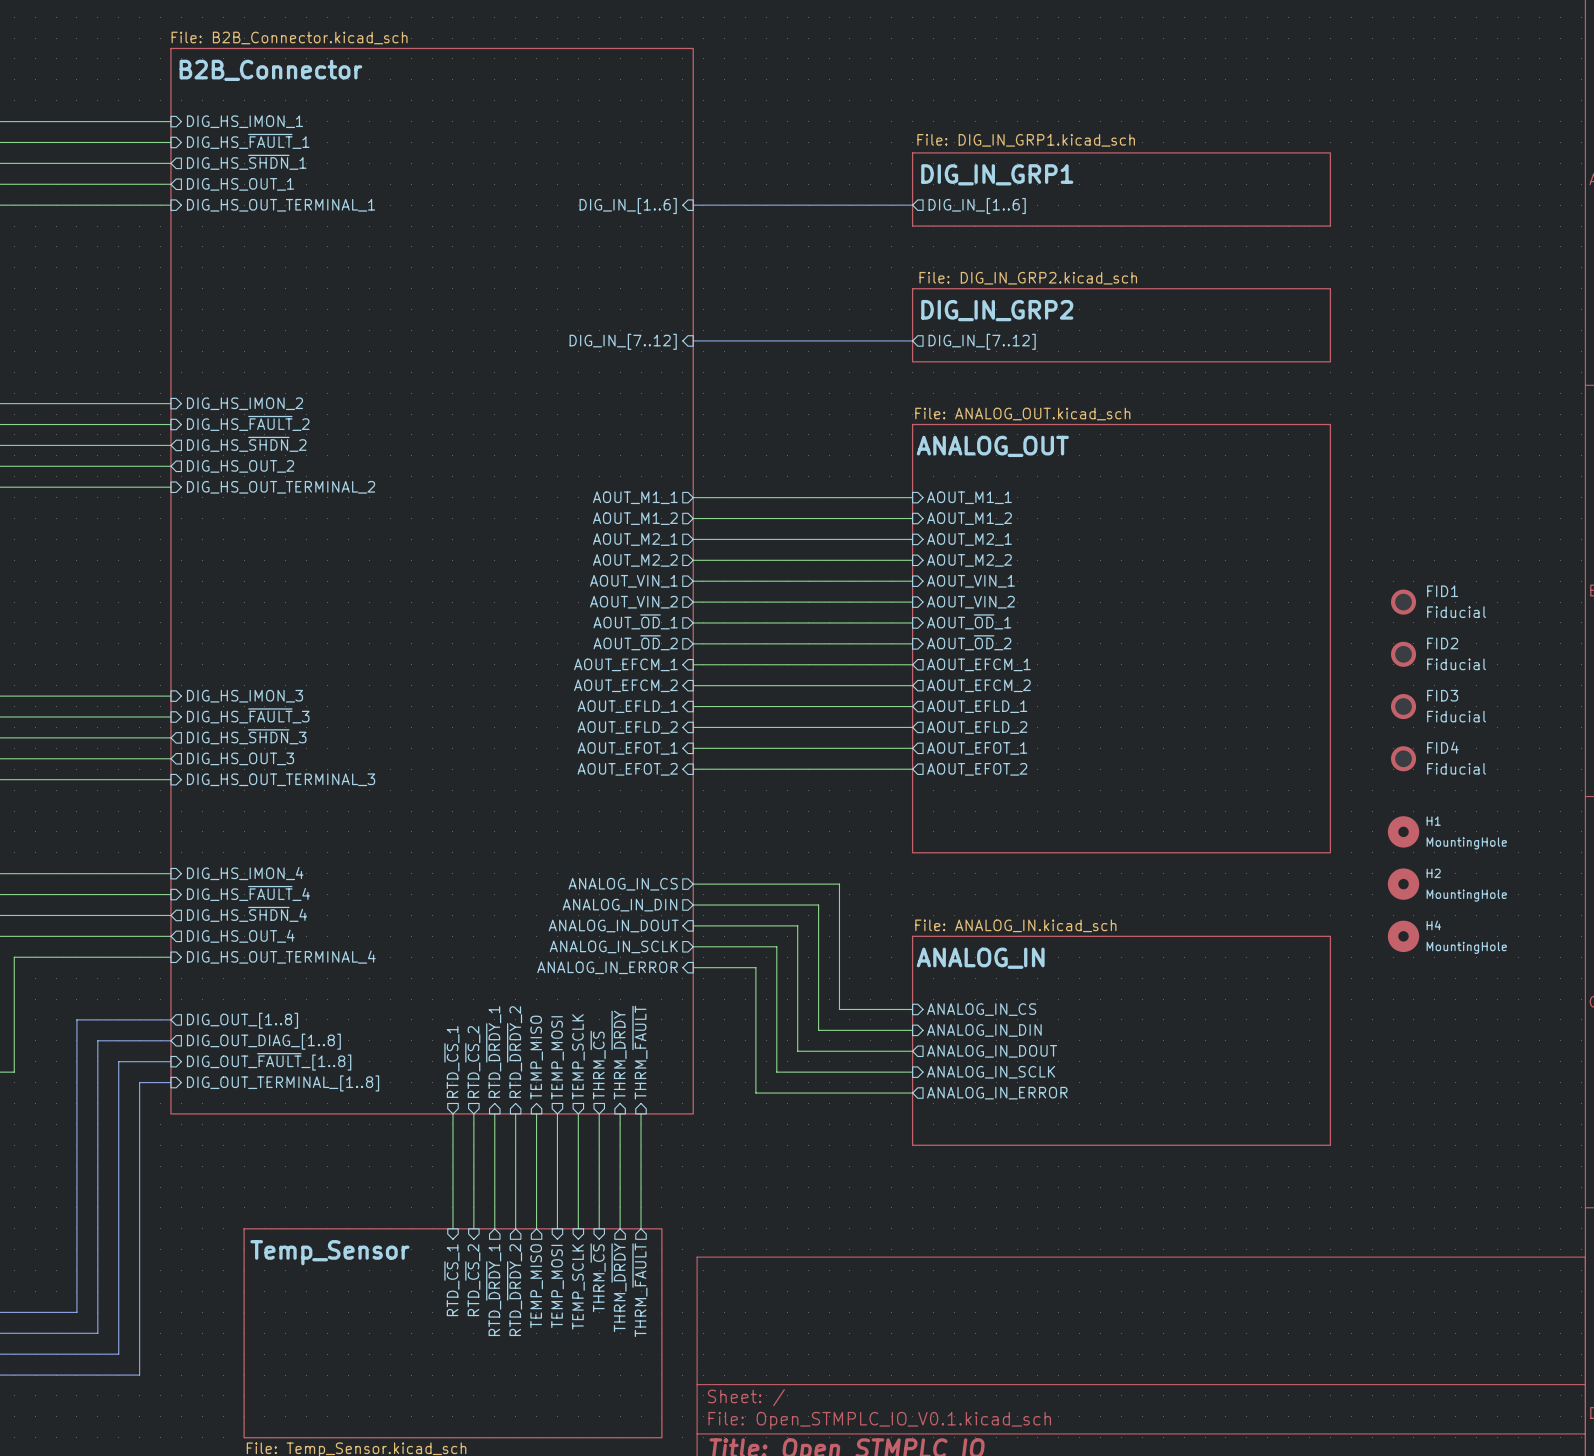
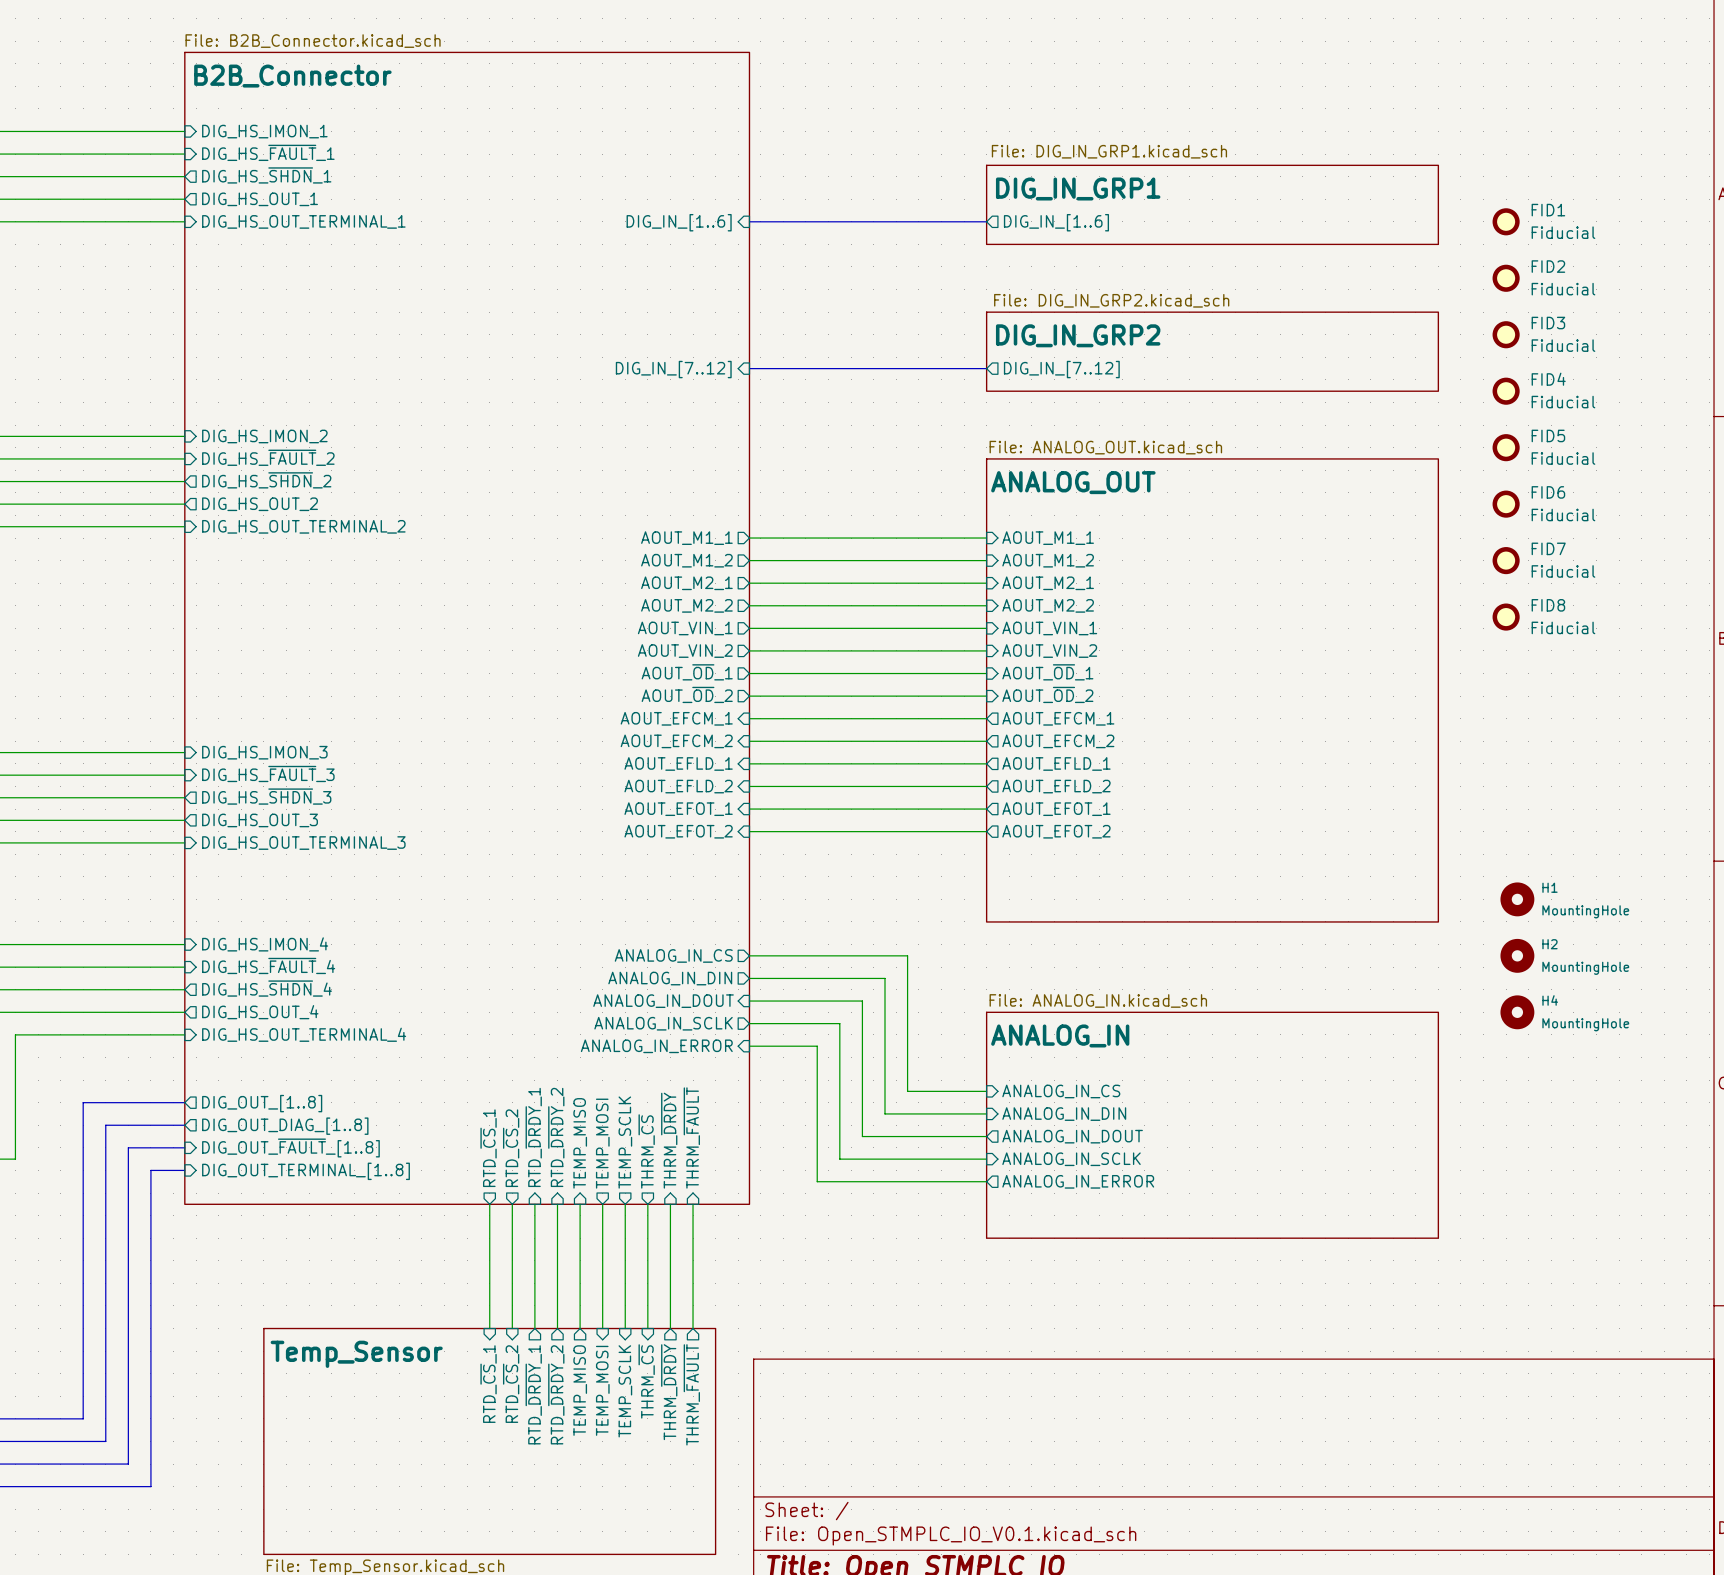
FID5: none -> Fiducial (1506, 447)
FID6: none -> Fiducial (1506, 504)
FID7: none -> Fiducial (1506, 560)
FID8: none -> Fiducial (1506, 617)
FID1 position: (1403, 602) -> (1506, 221)
FID2 position: (1403, 654) -> (1506, 278)
FID3 position: (1403, 706) -> (1506, 334)
FID4 position: (1403, 758) -> (1506, 391)

